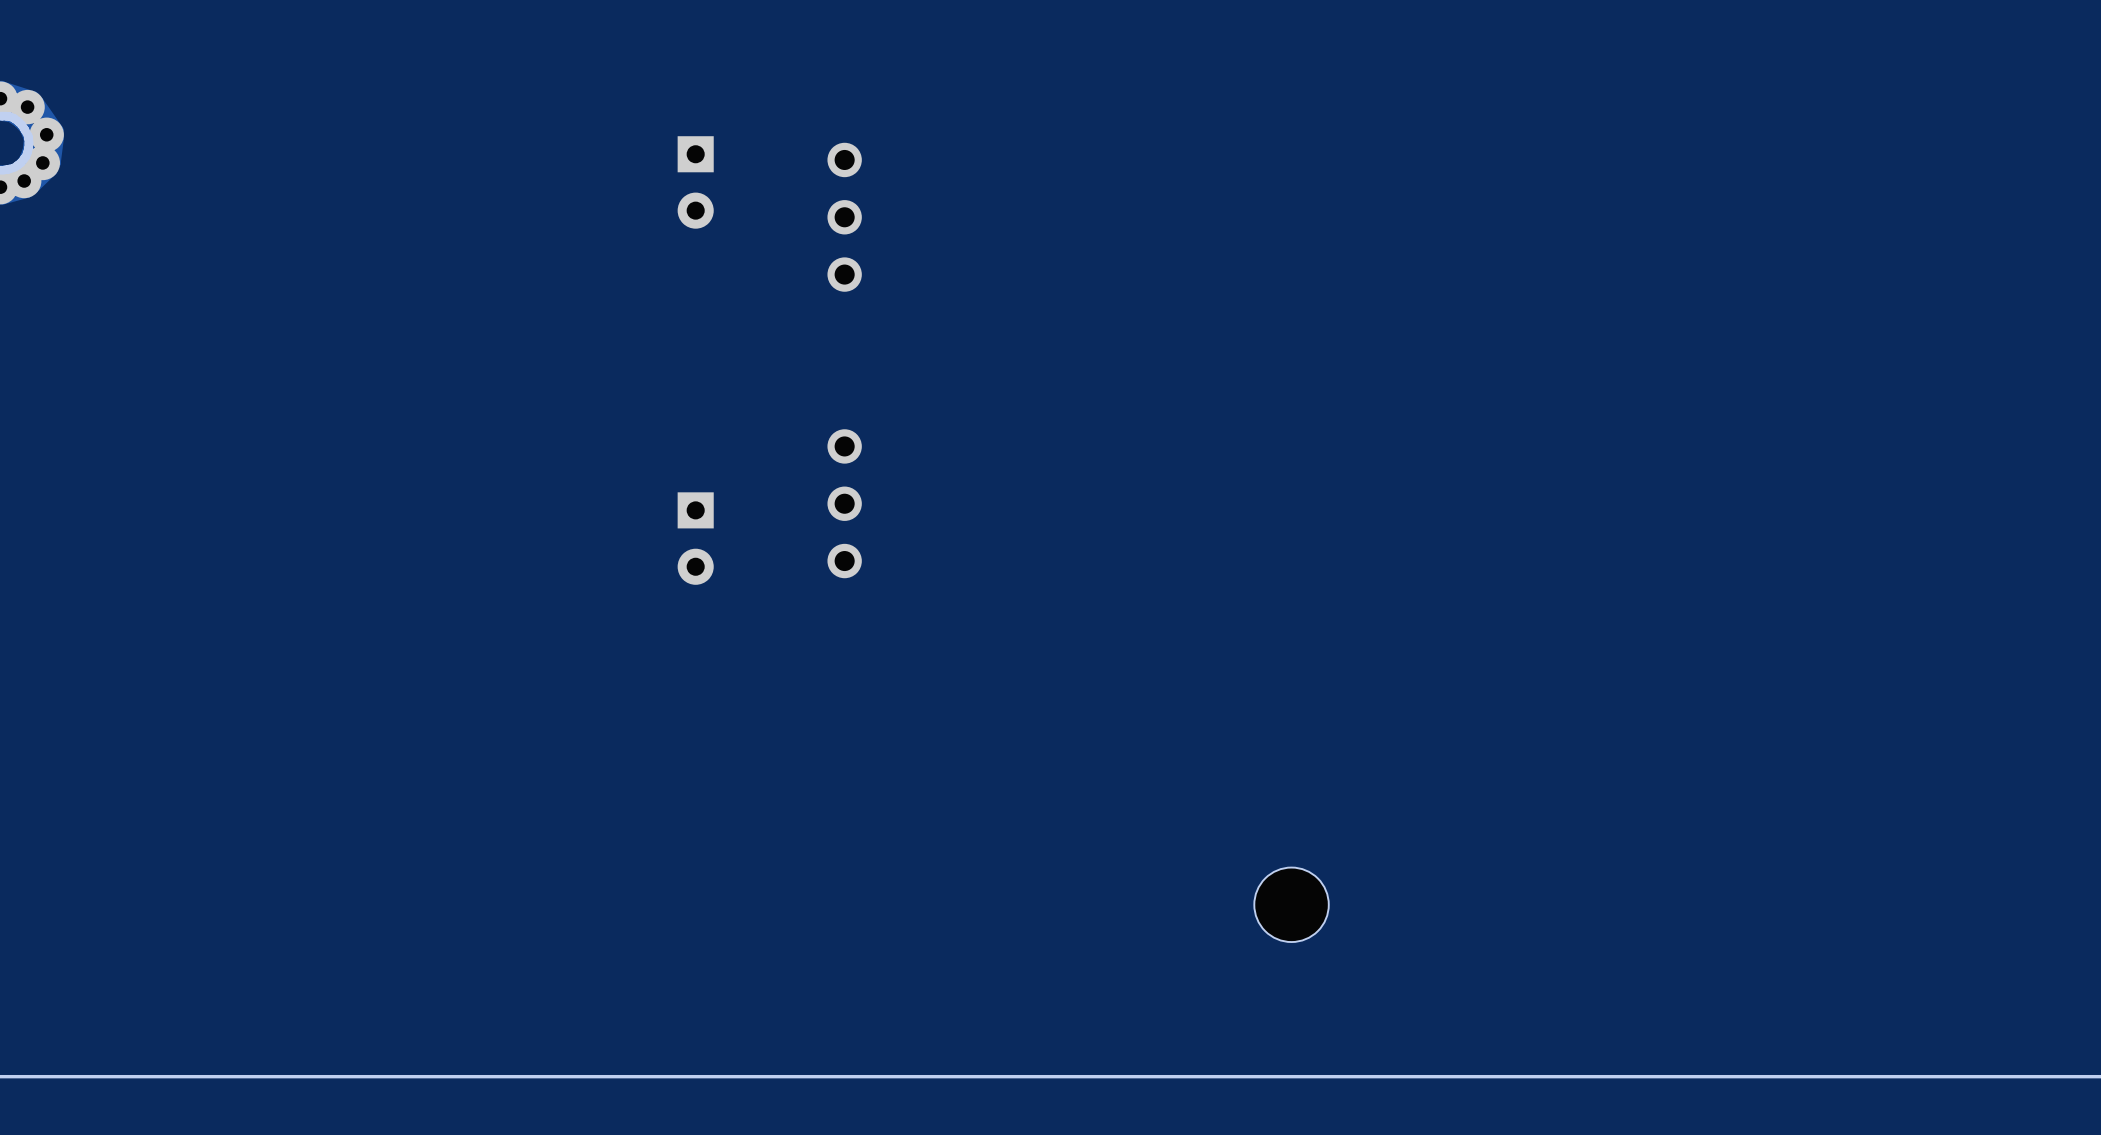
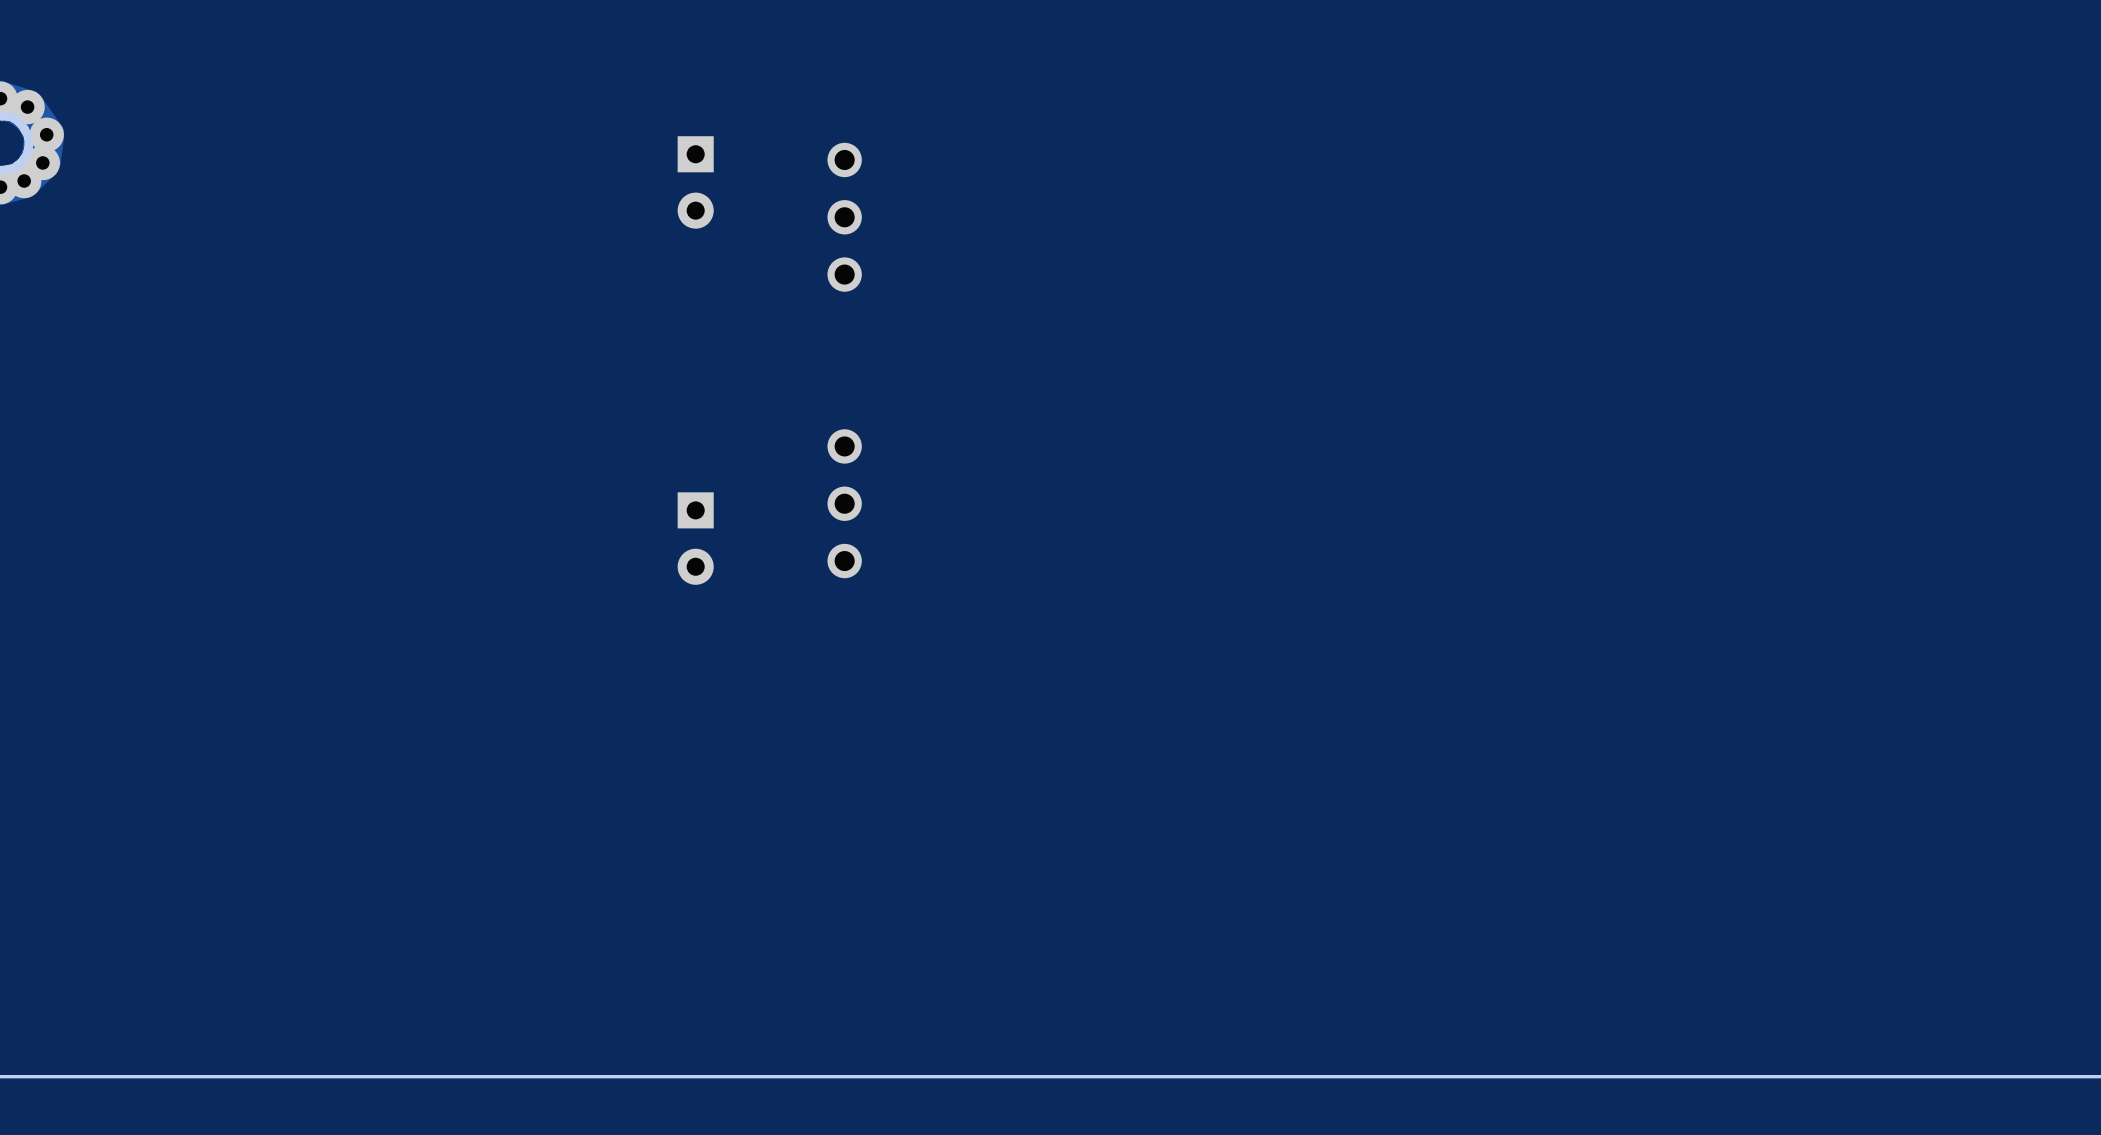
part: (1291, 904) -> none

